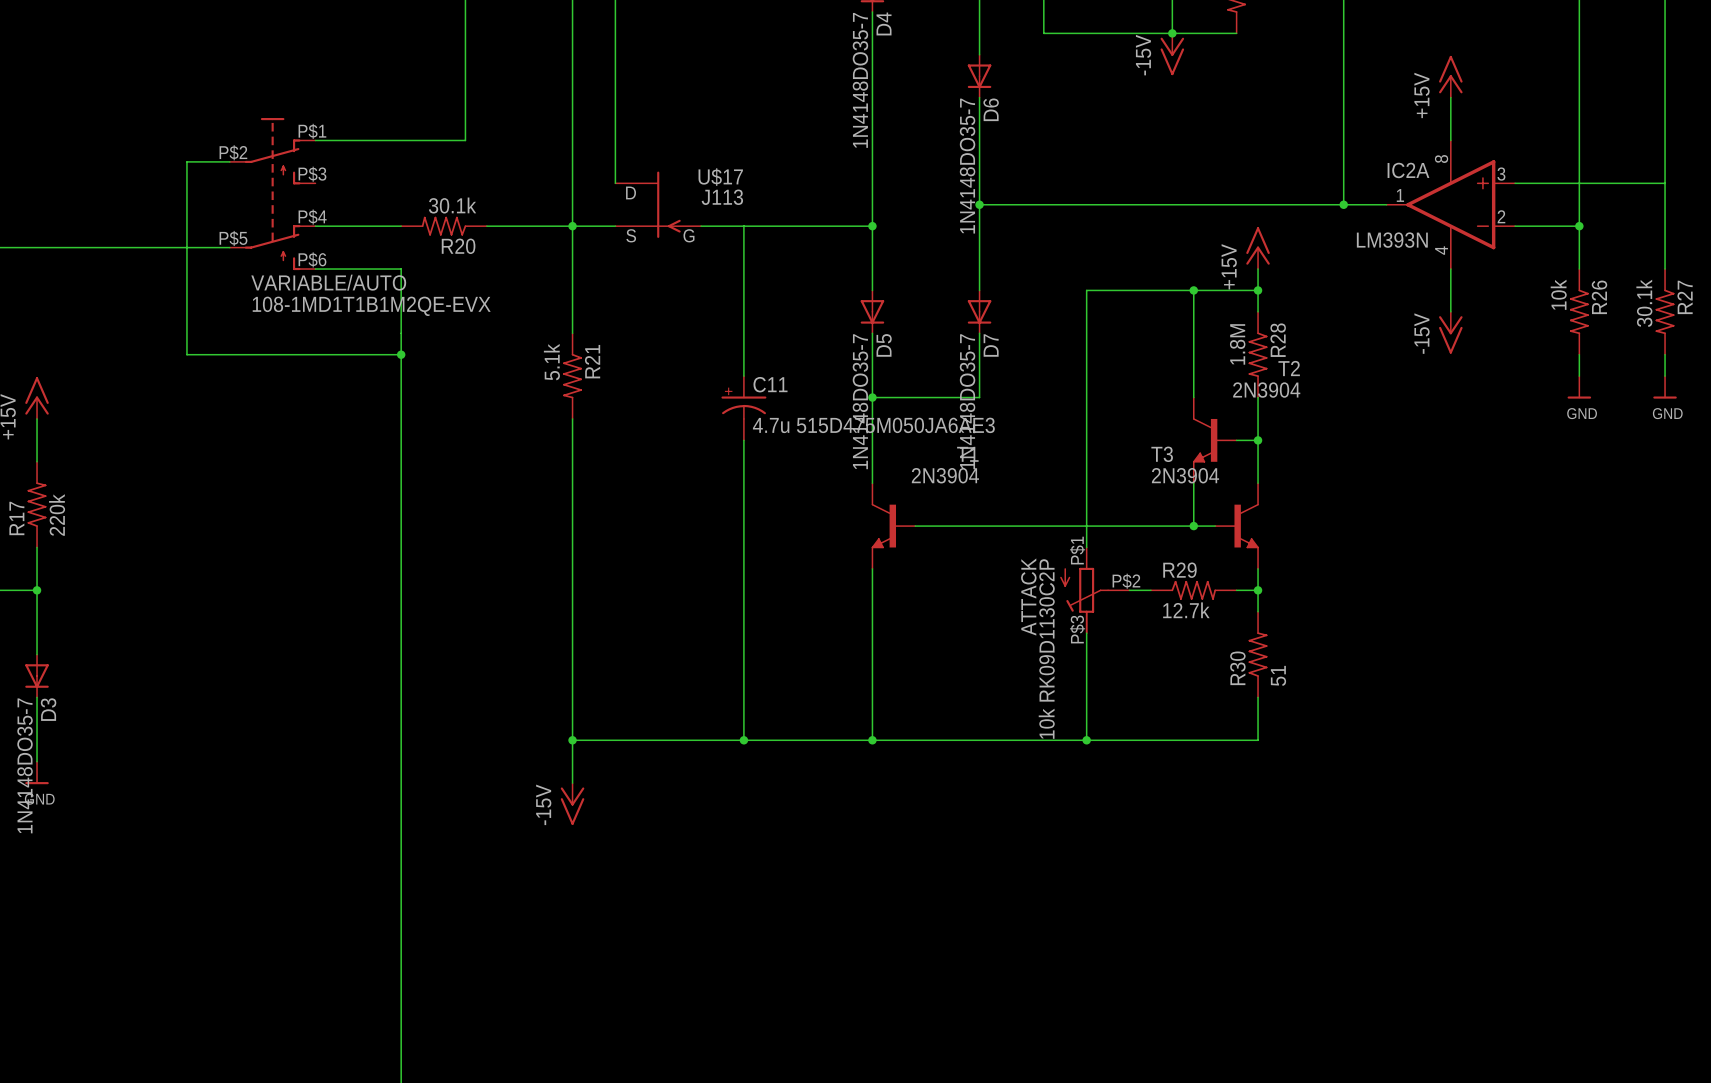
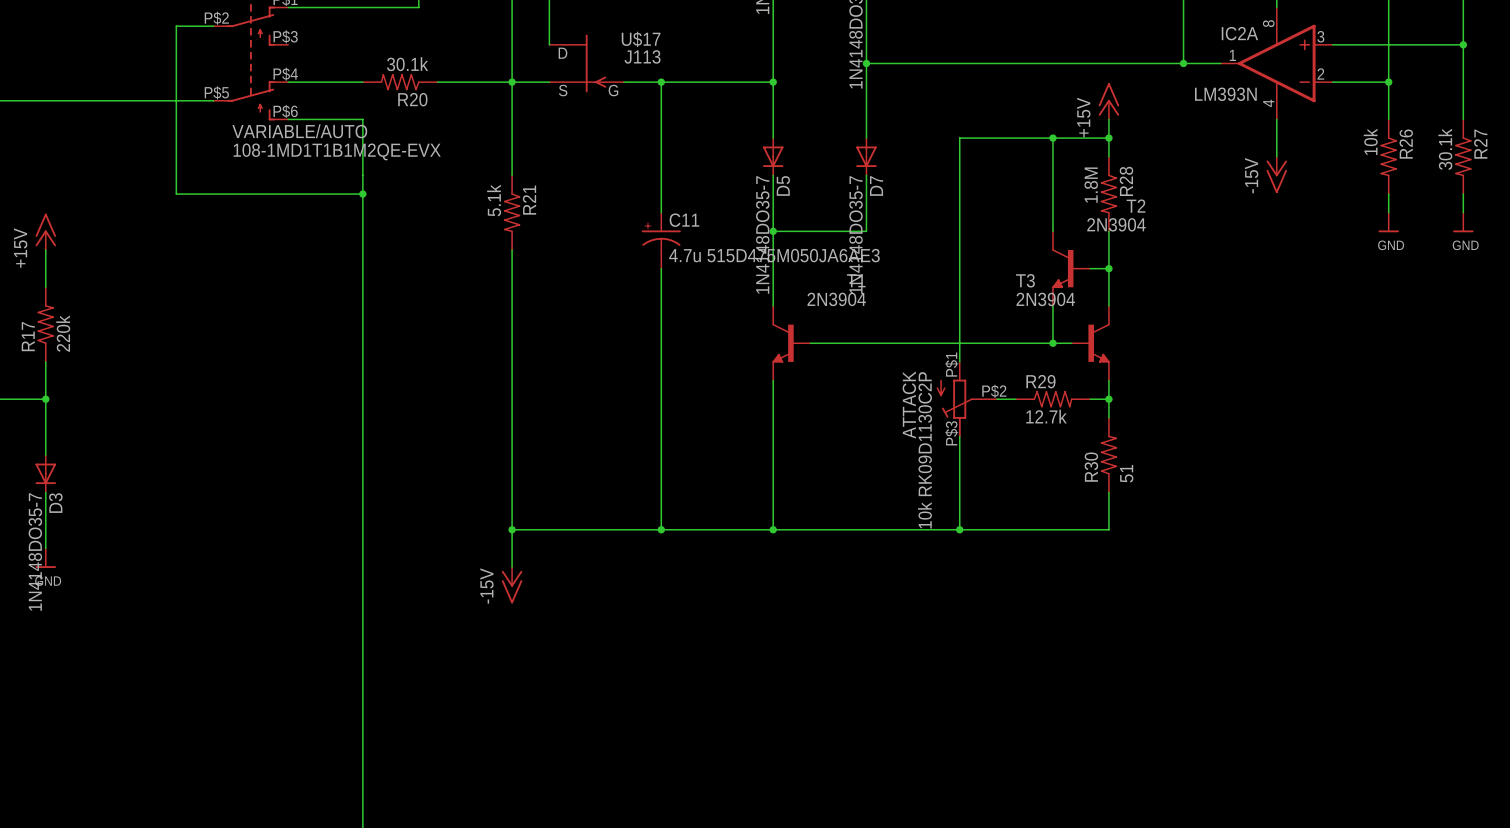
junction: none -> (1463, 44)
junction: none -> (661, 82)

